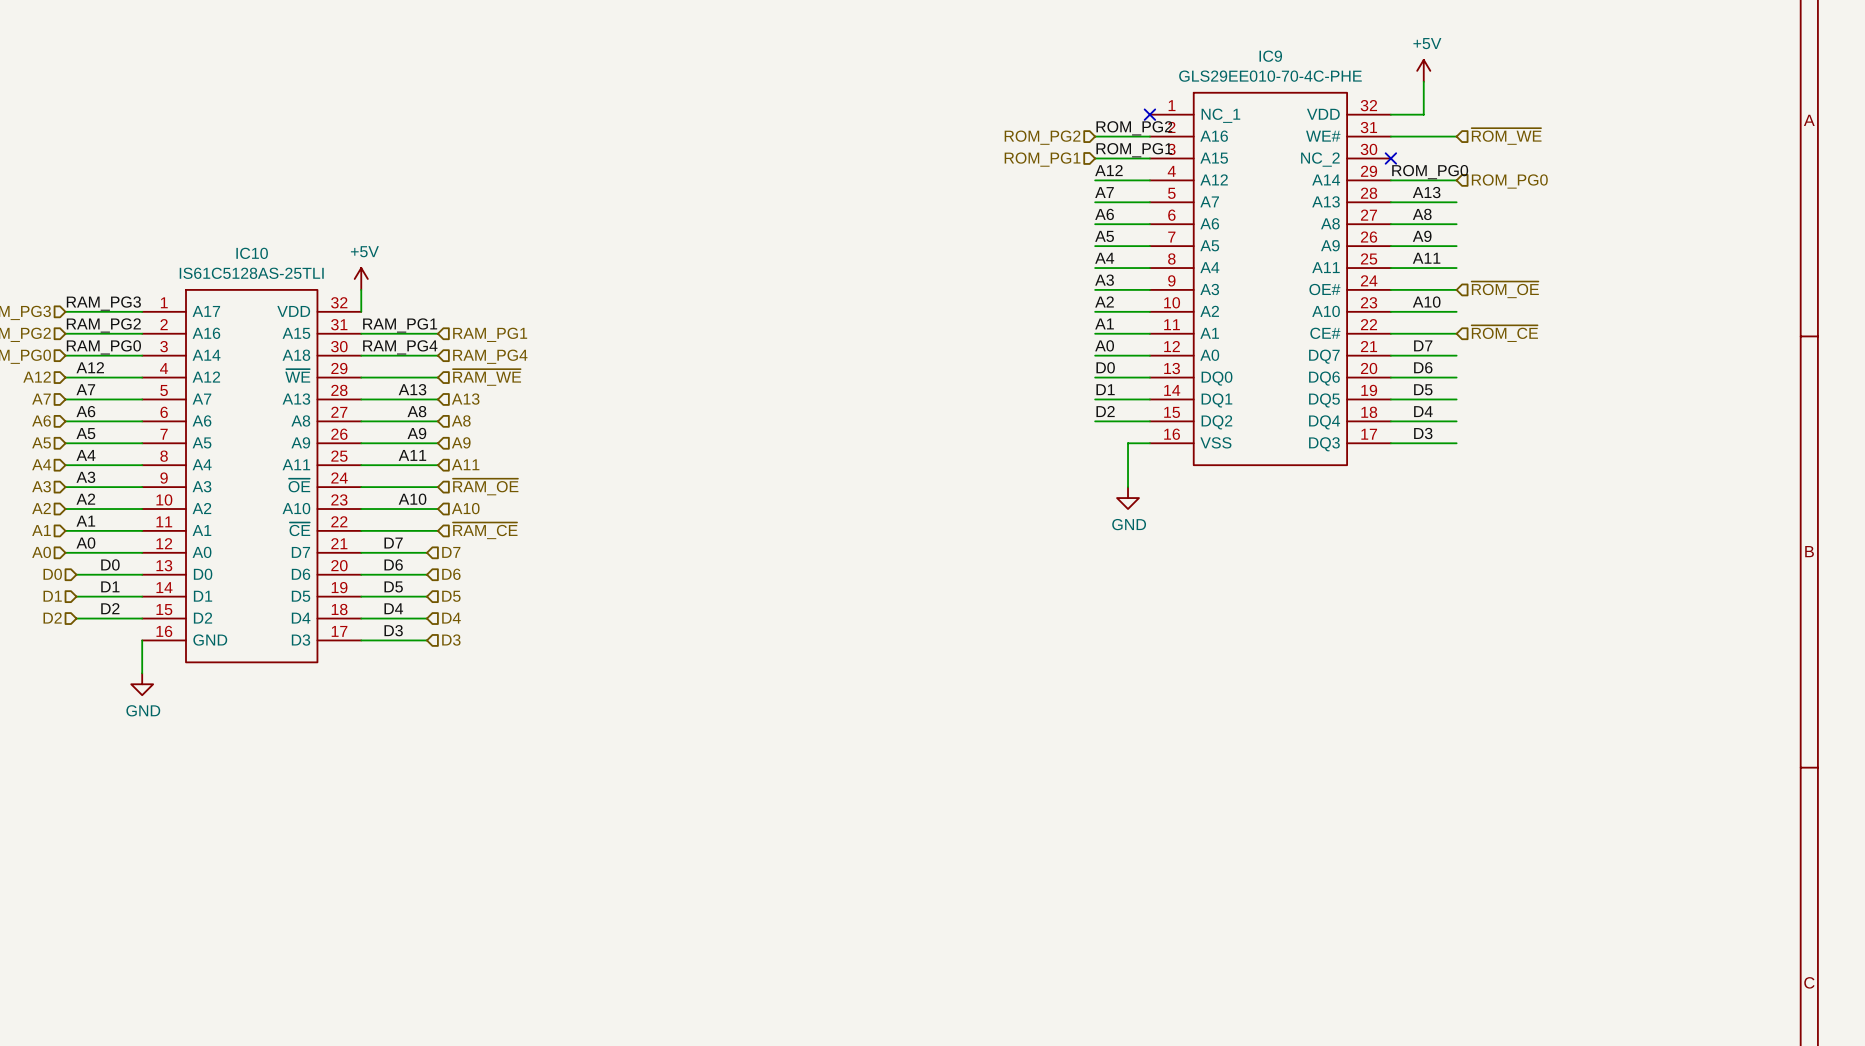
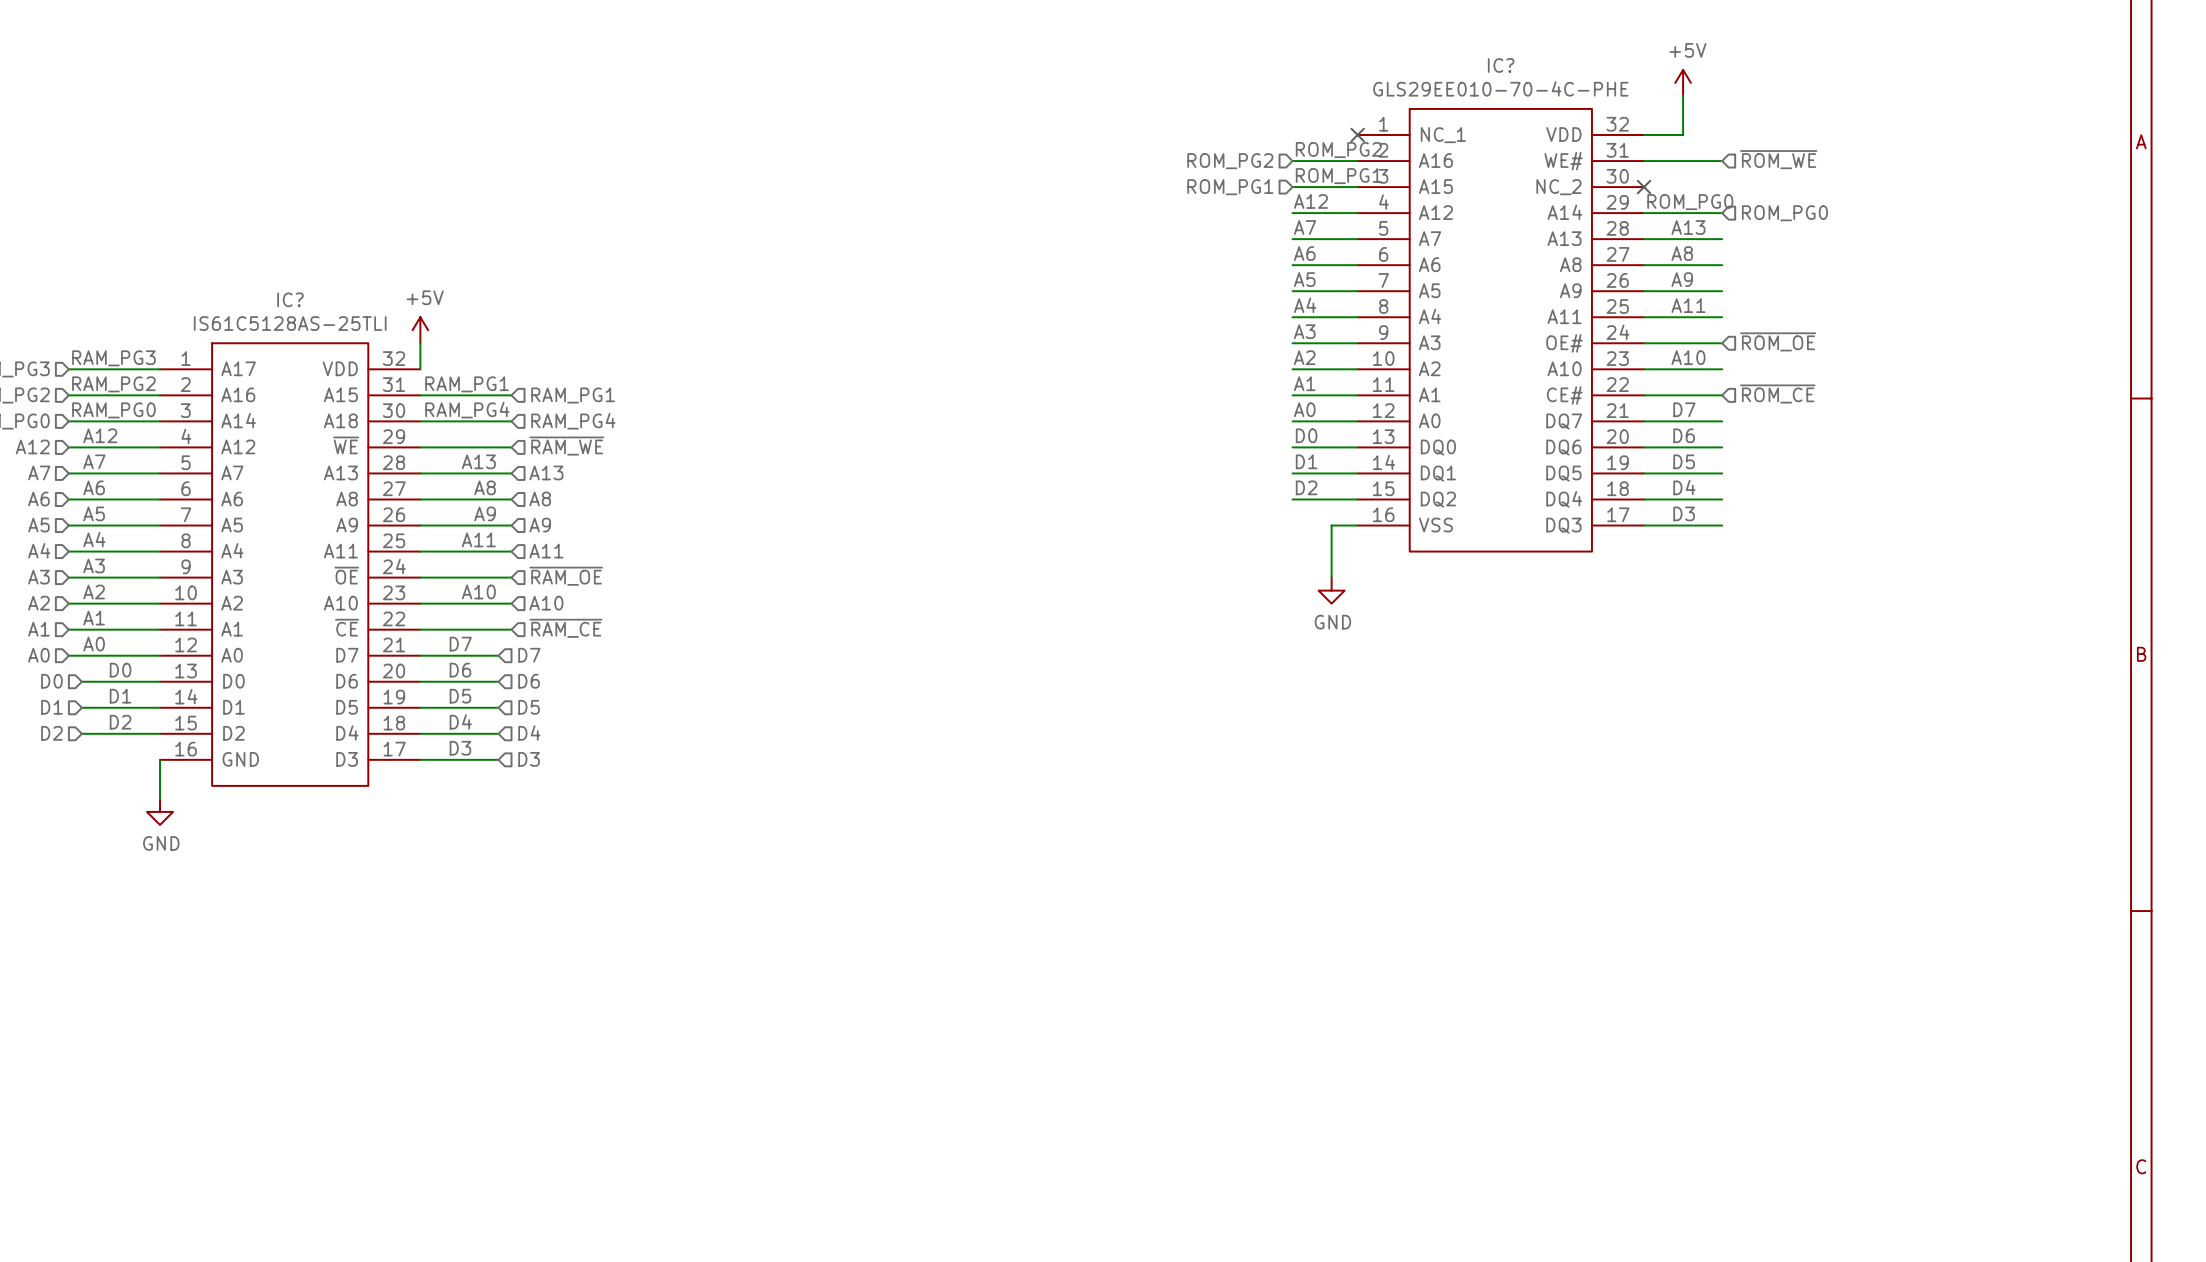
IC9 name: IC9 (1270, 56) -> IC? (1501, 65)
IC10 name: IC10 (252, 253) -> IC? (290, 299)

